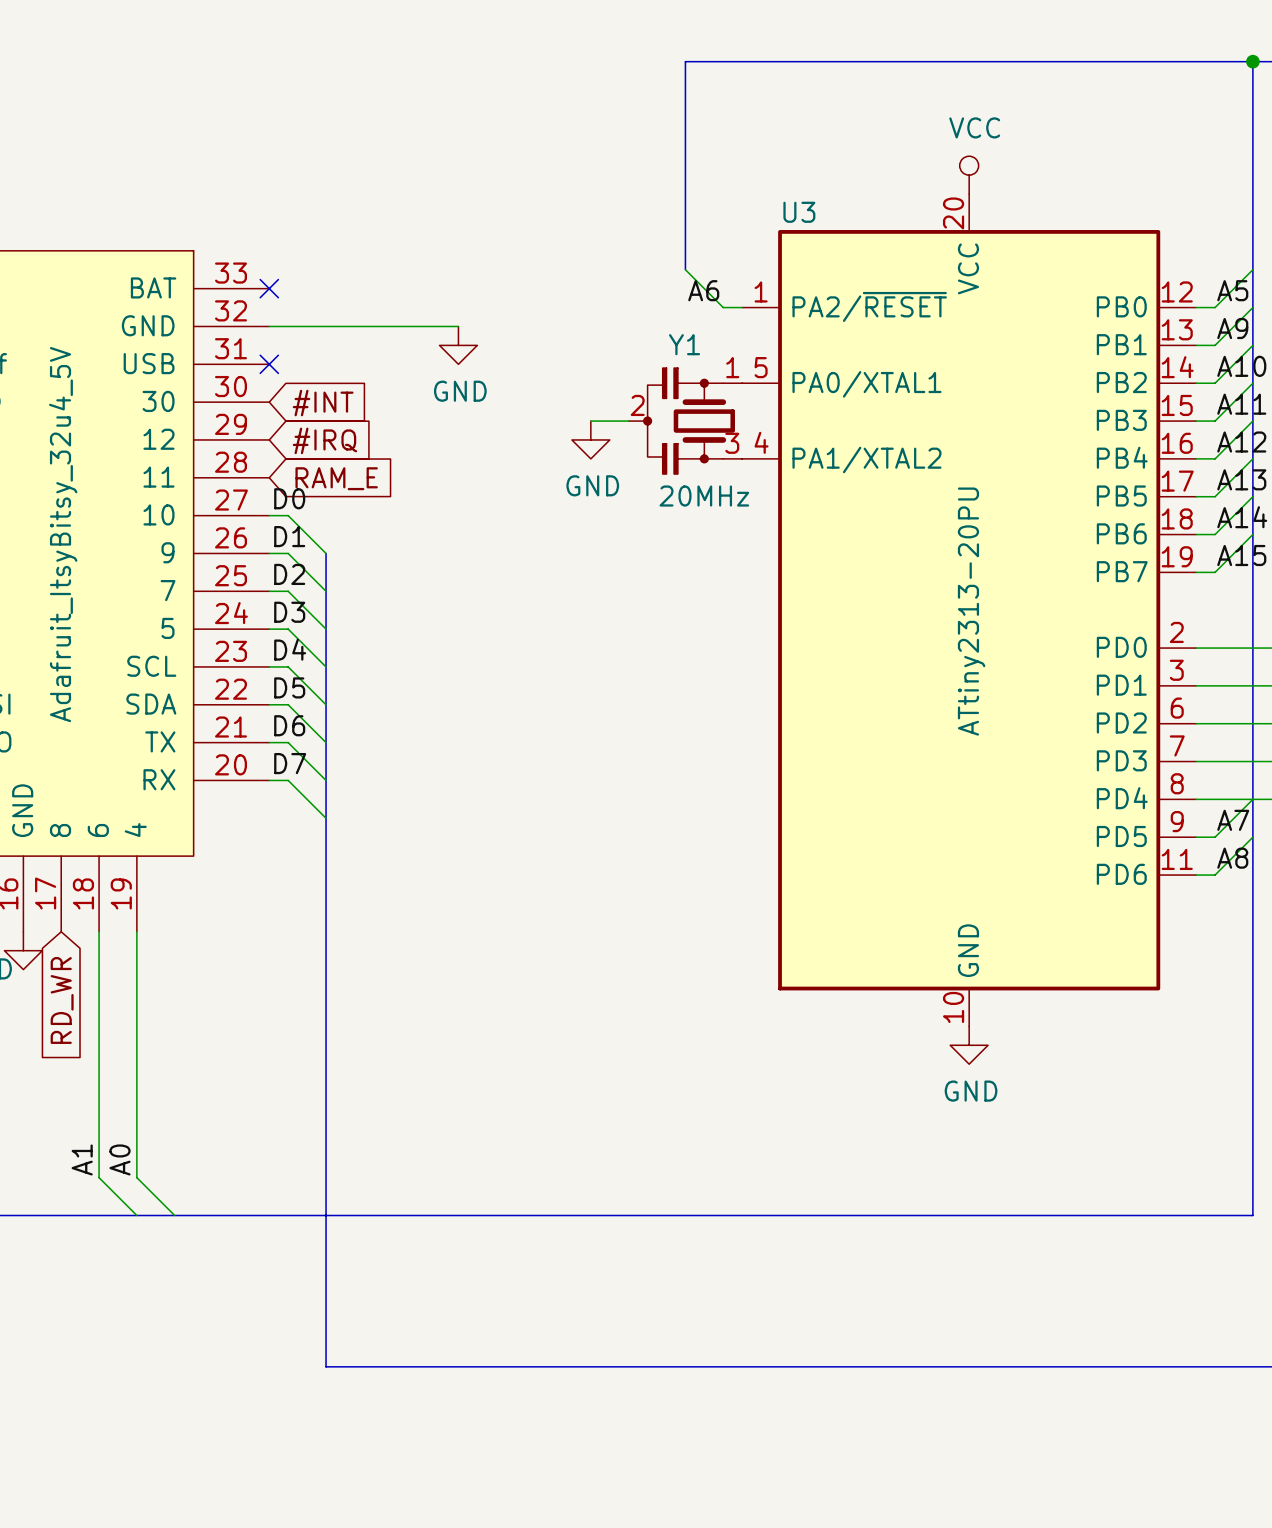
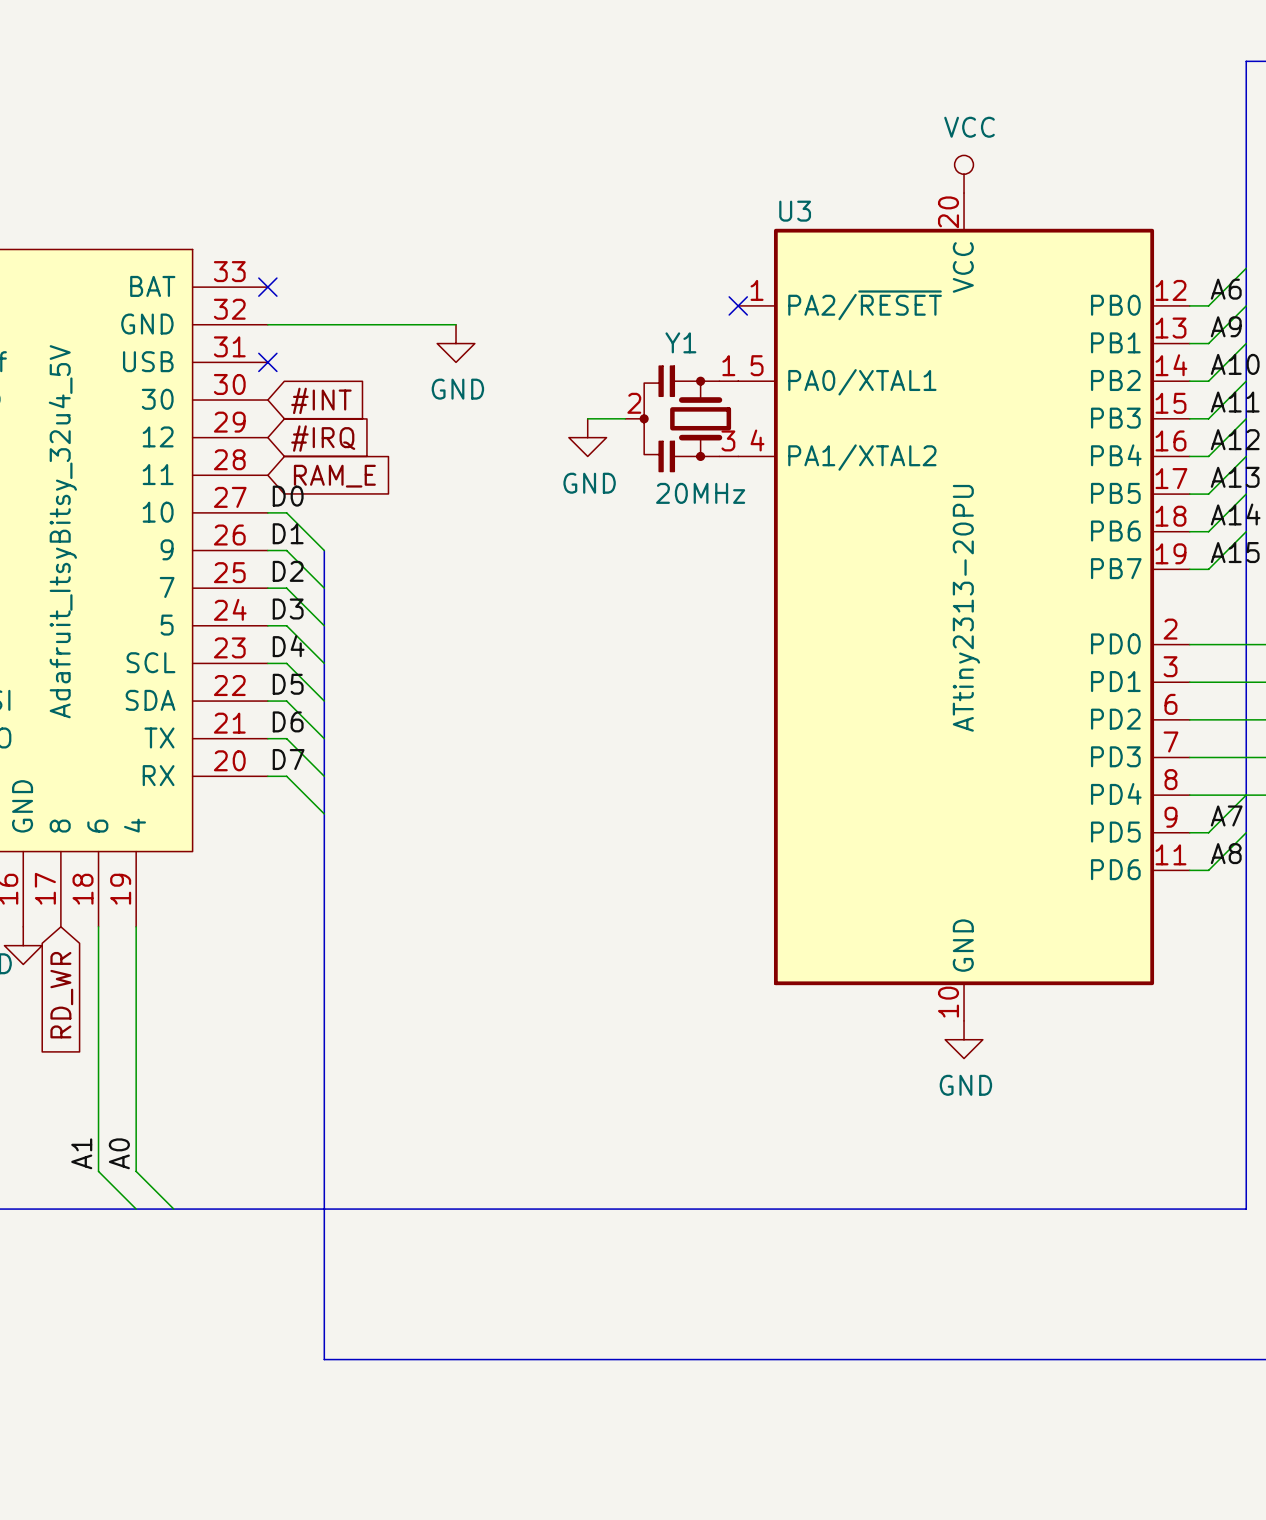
bus: (1252, 61) (685, 61) (685, 269) -> none
junction: (1252, 61) -> none
wire: (685, 269) (723, 307) (742, 307) -> none
label: A6 (703, 290) -> none
label: A5 (1232, 290) -> A6 (1226, 289)
no-connect mark: none -> (738, 305)

